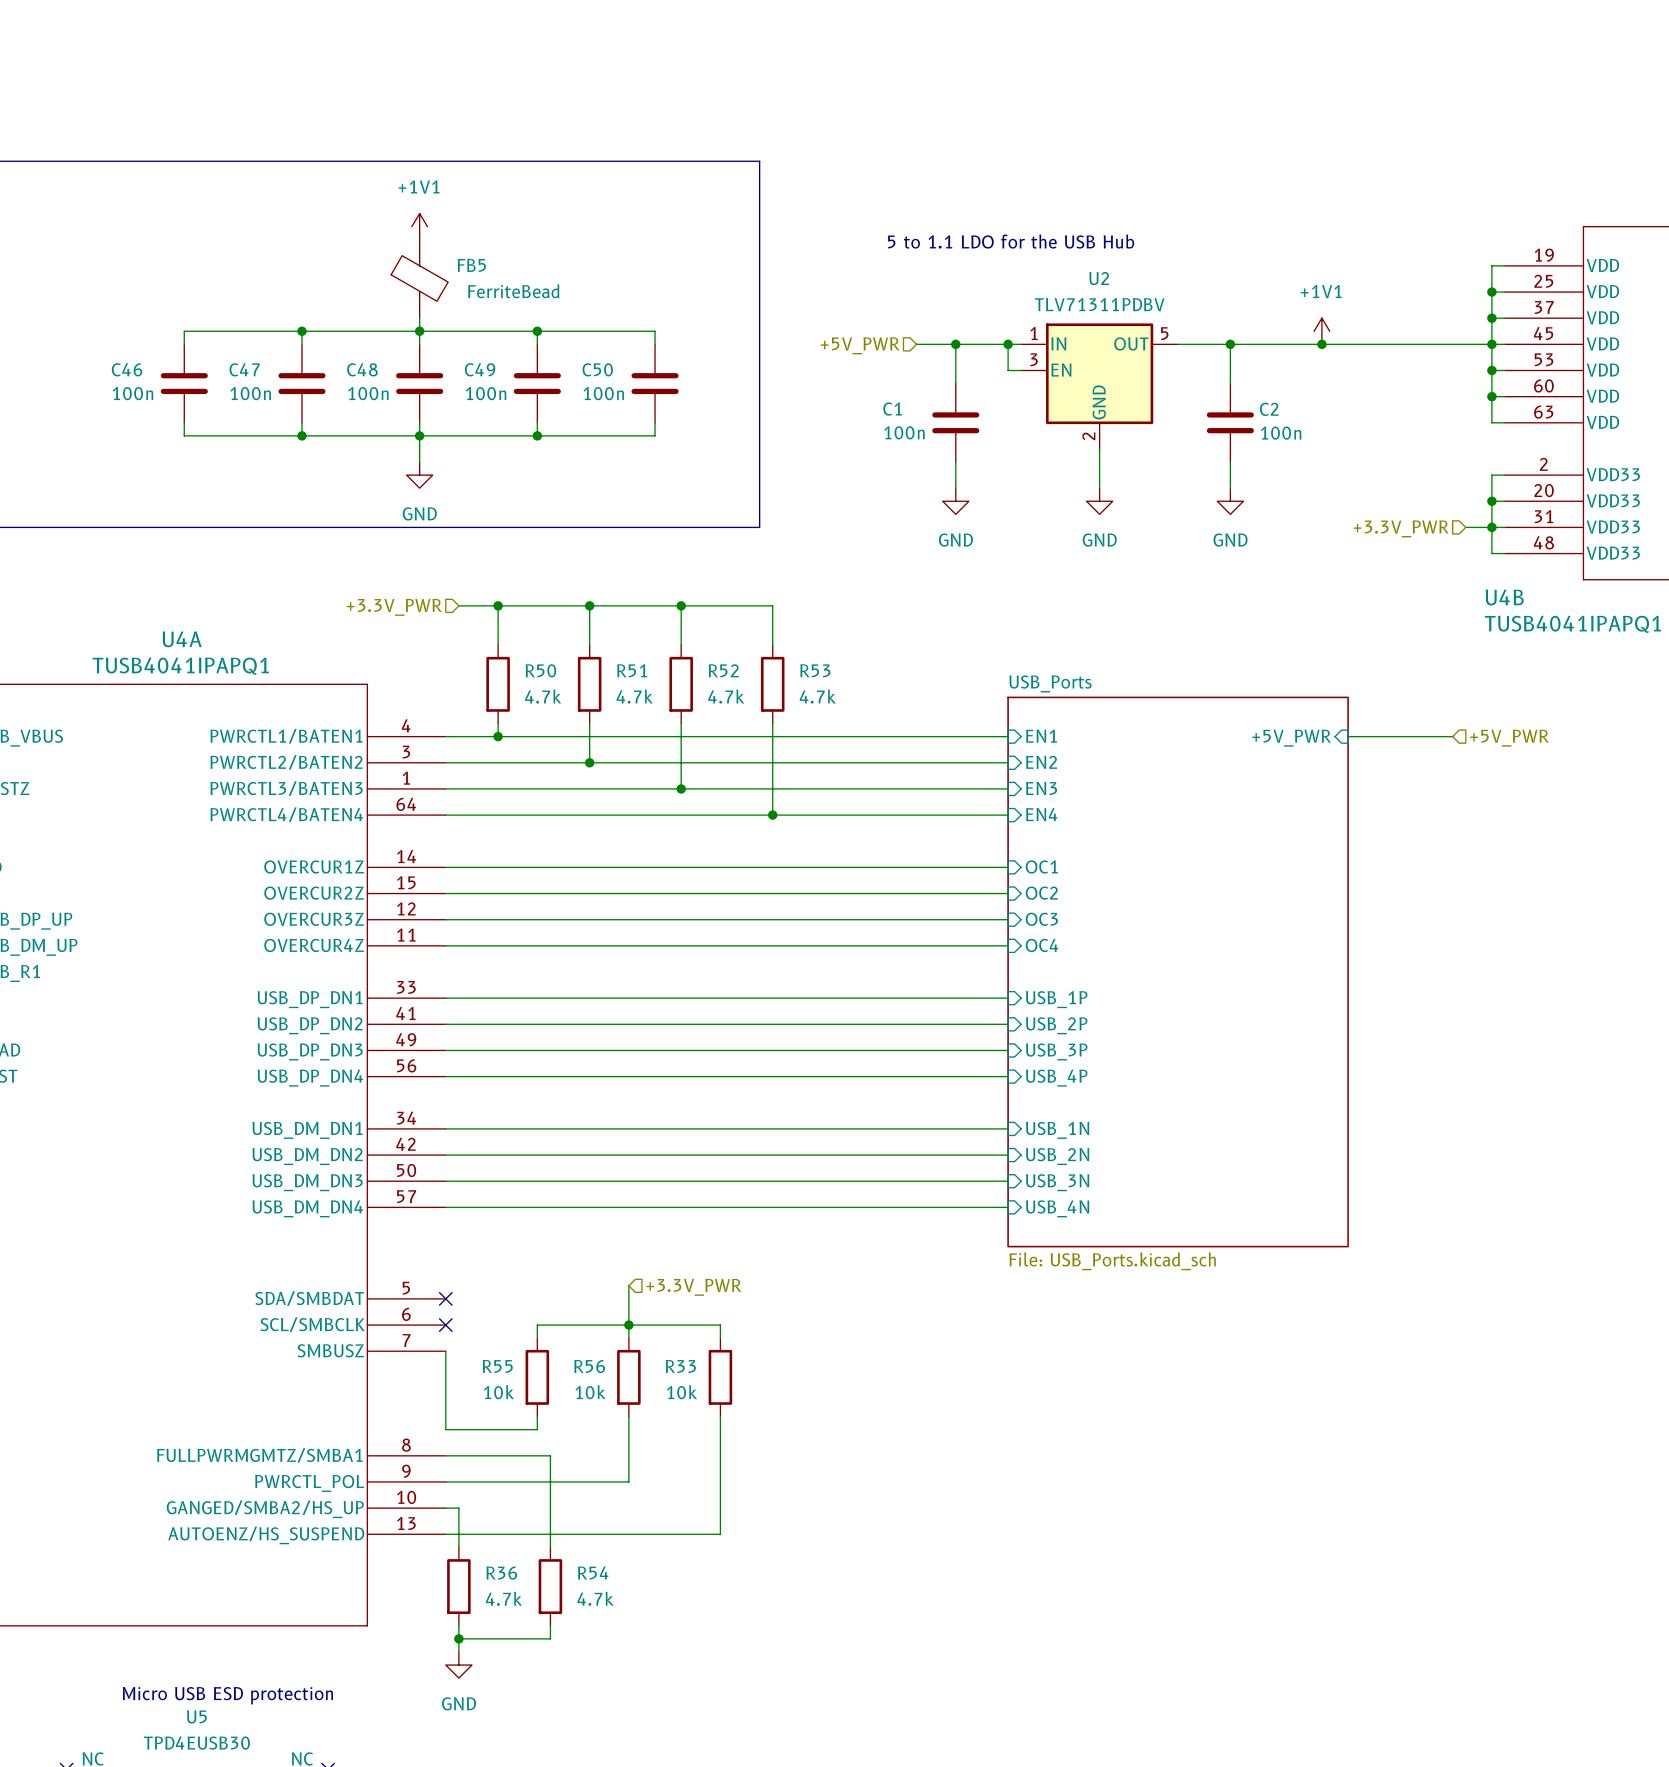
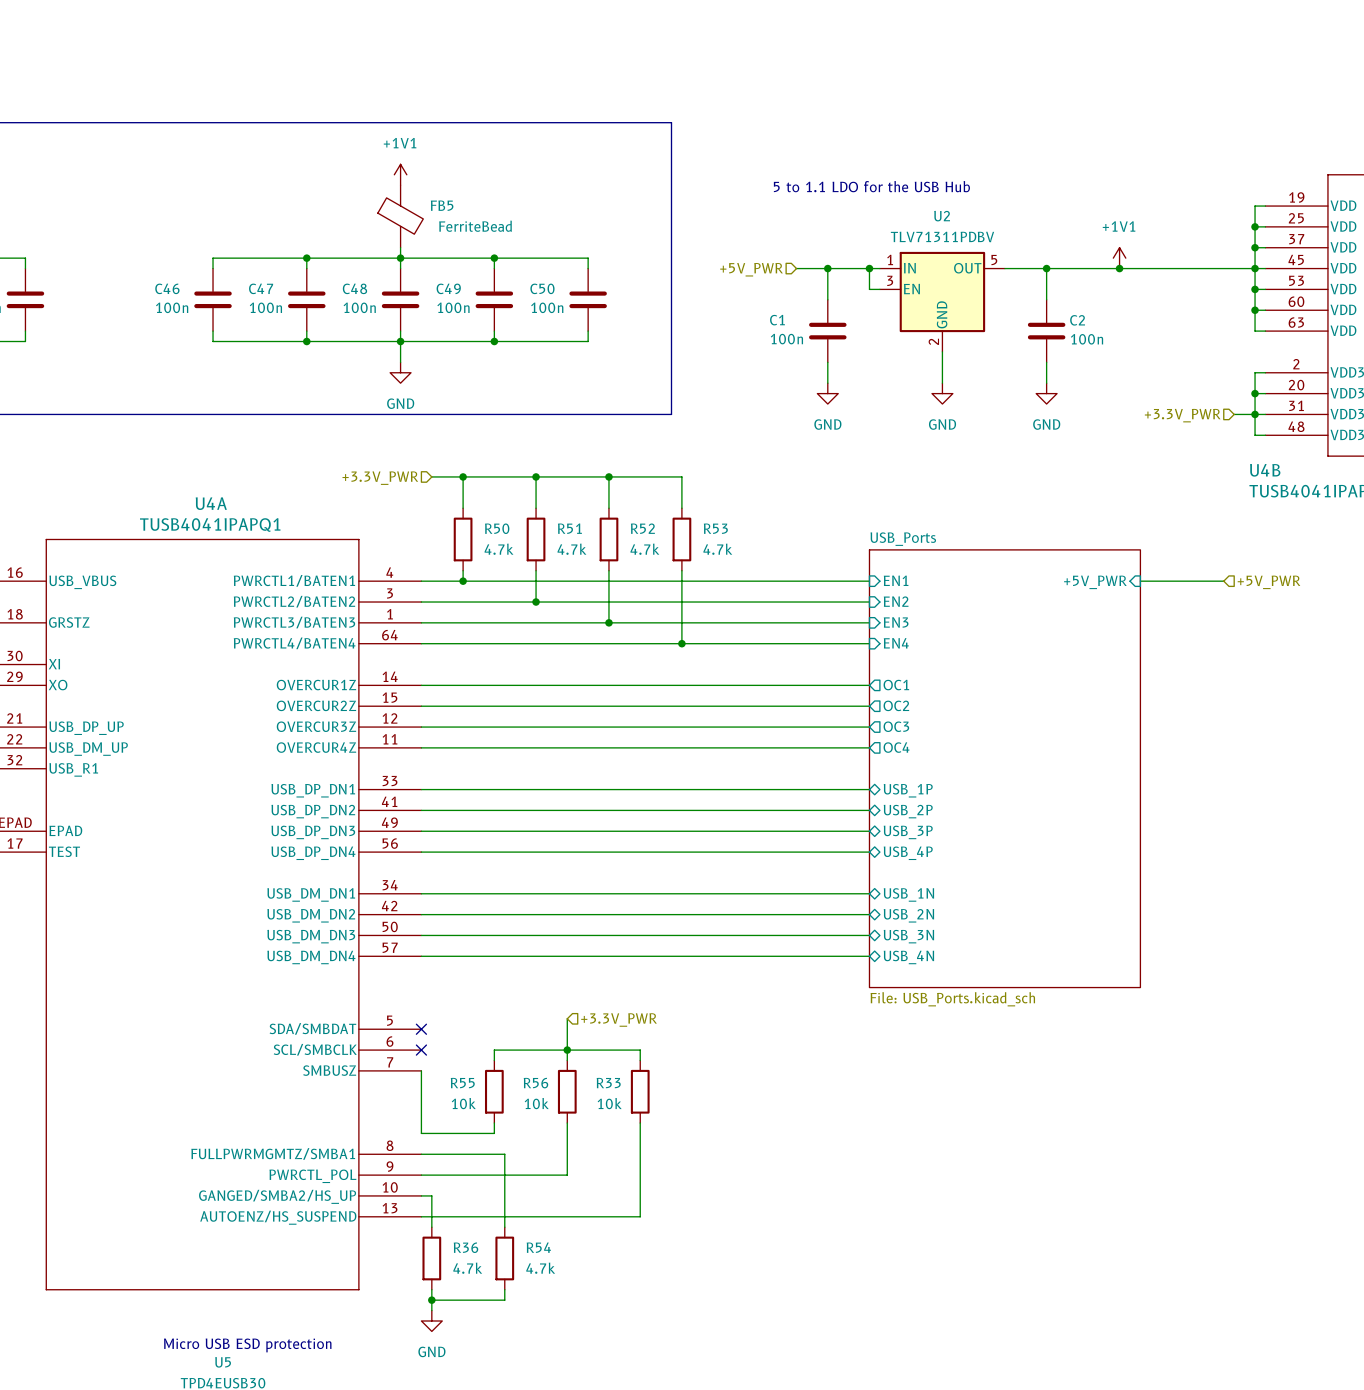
sheet pin shape: input (1041, 866) -> output (896, 685)
sheet pin shape: input (1041, 893) -> output (896, 705)
sheet pin shape: input (1041, 919) -> output (896, 726)
sheet pin shape: input (1042, 945) -> output (896, 747)
sheet pin shape: input (1056, 999) -> bidirectional (908, 790)
sheet pin shape: input (1056, 1025) -> bidirectional (908, 811)
sheet pin shape: input (1056, 1051) -> bidirectional (908, 832)
sheet pin shape: input (1056, 1078) -> bidirectional (908, 853)
sheet pin shape: input (1057, 1130) -> bidirectional (908, 894)
sheet pin shape: input (1057, 1156) -> bidirectional (908, 915)
sheet pin shape: input (1057, 1182) -> bidirectional (908, 936)
sheet pin shape: input (1057, 1208) -> bidirectional (908, 957)

